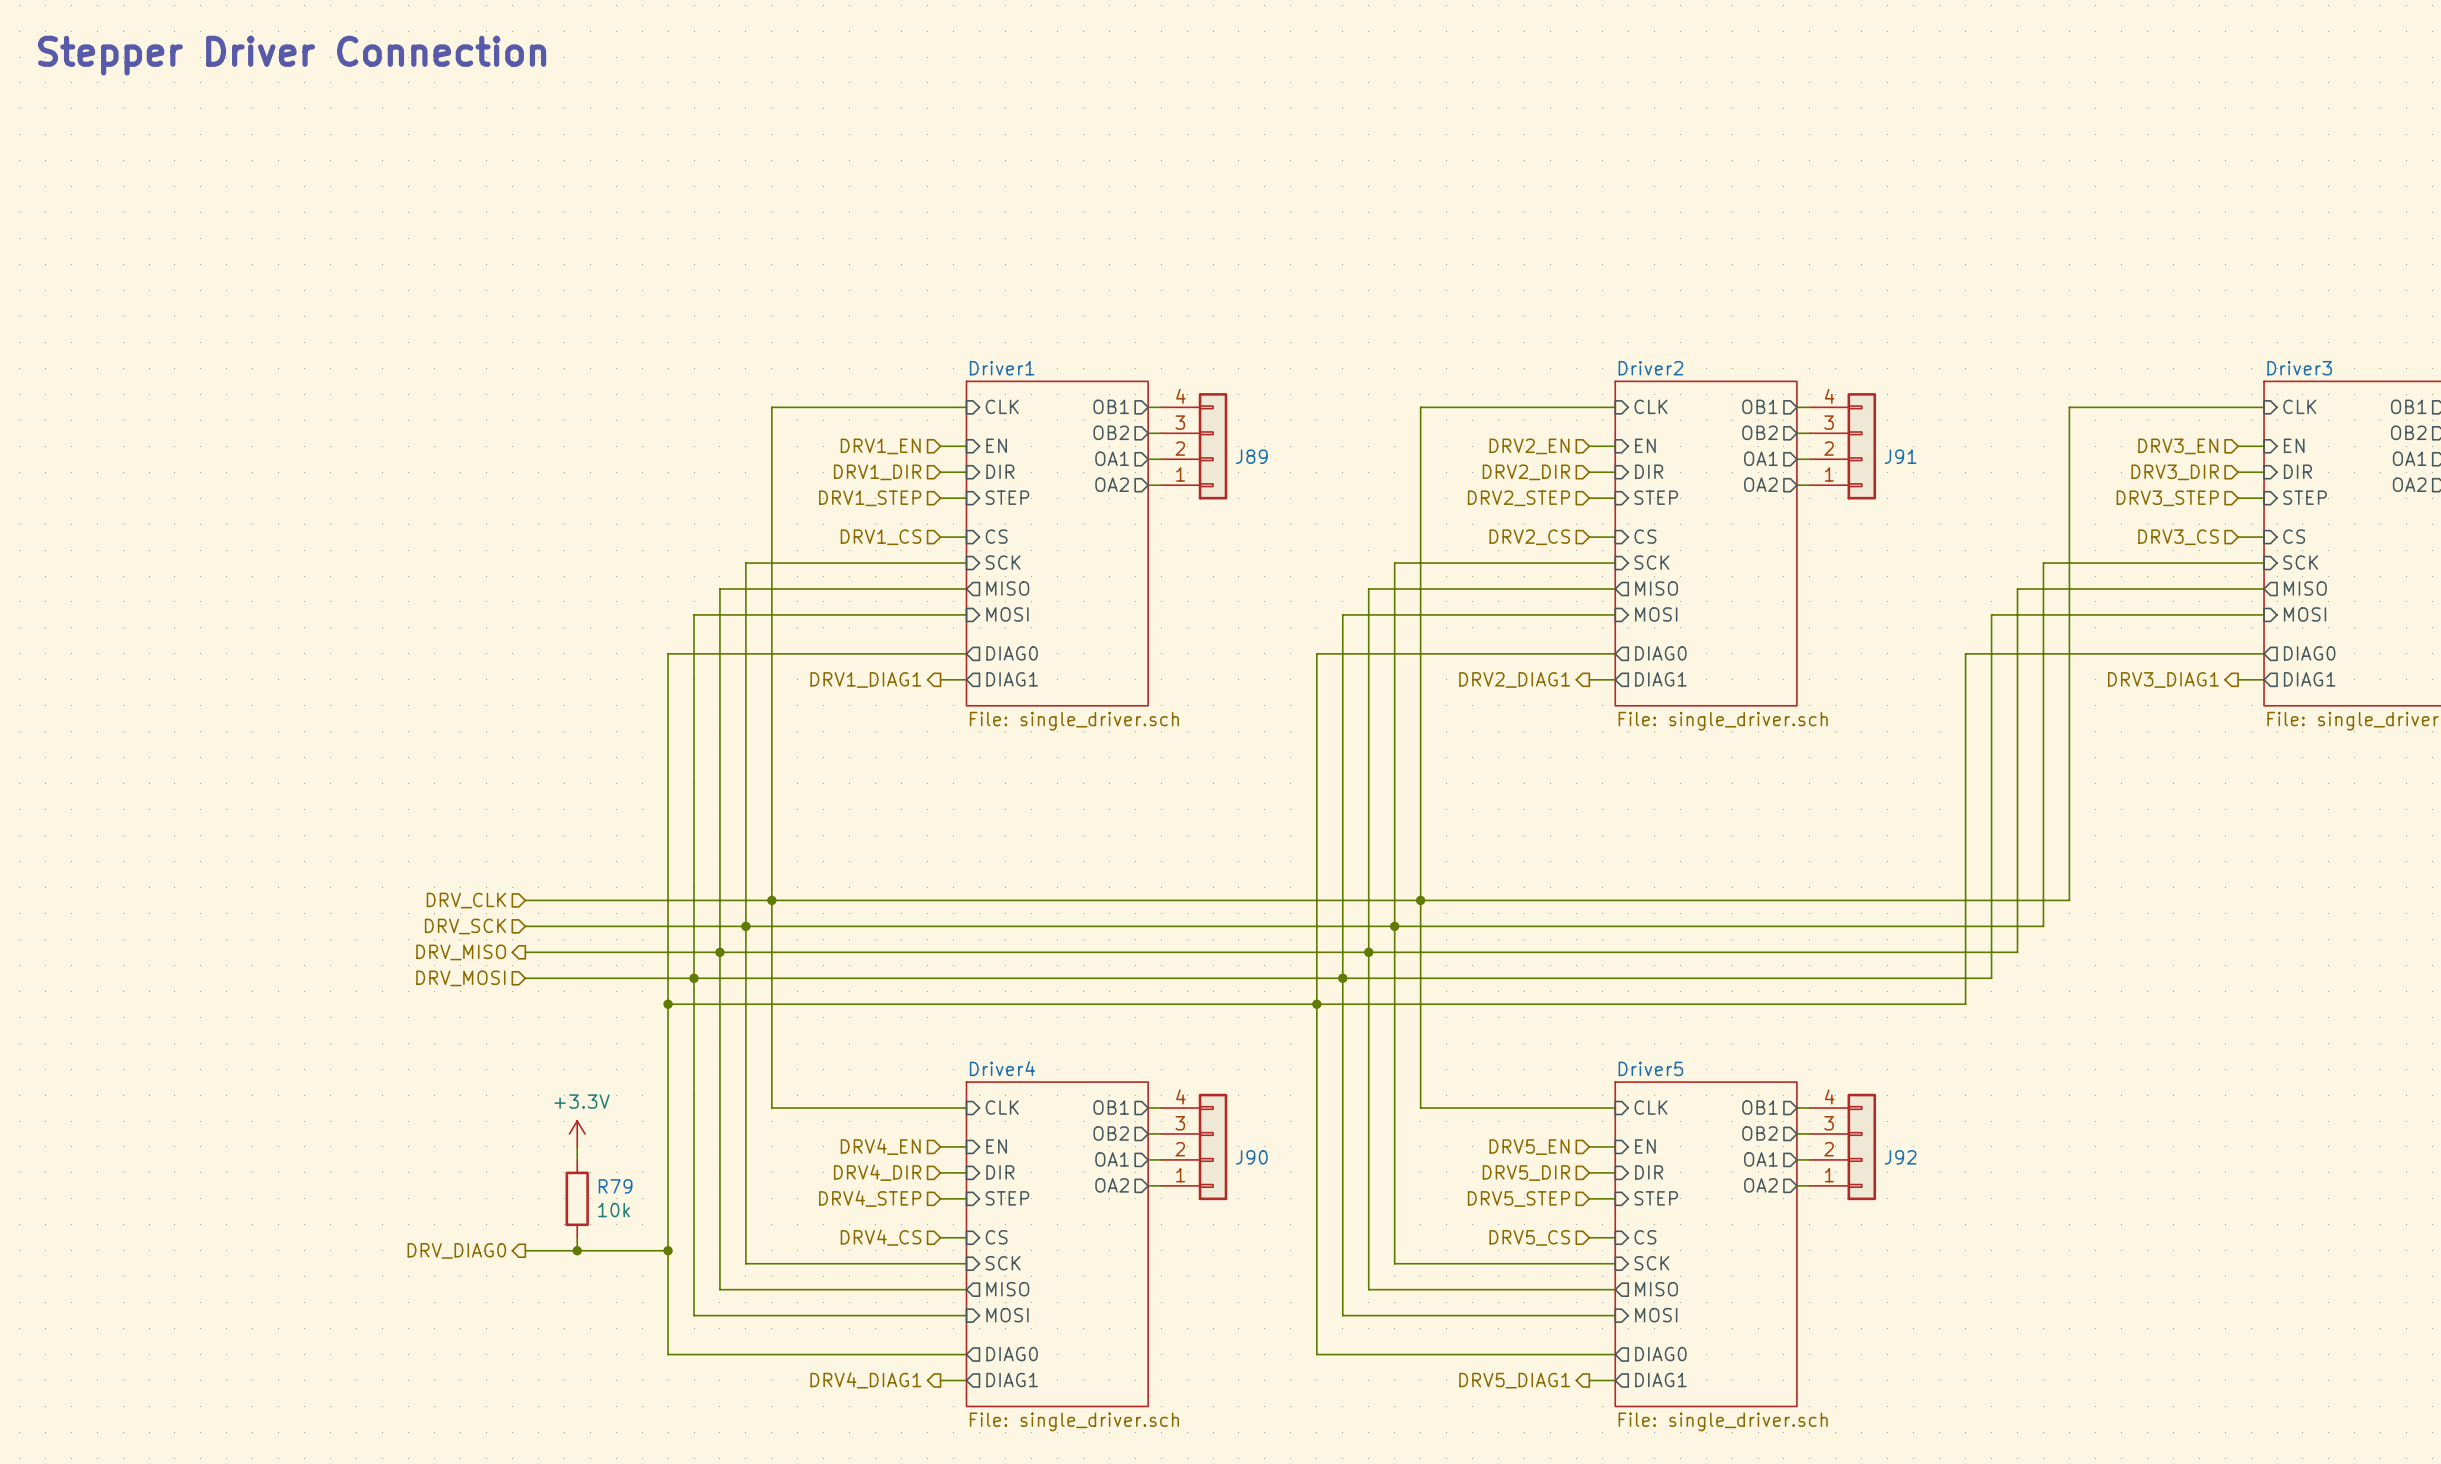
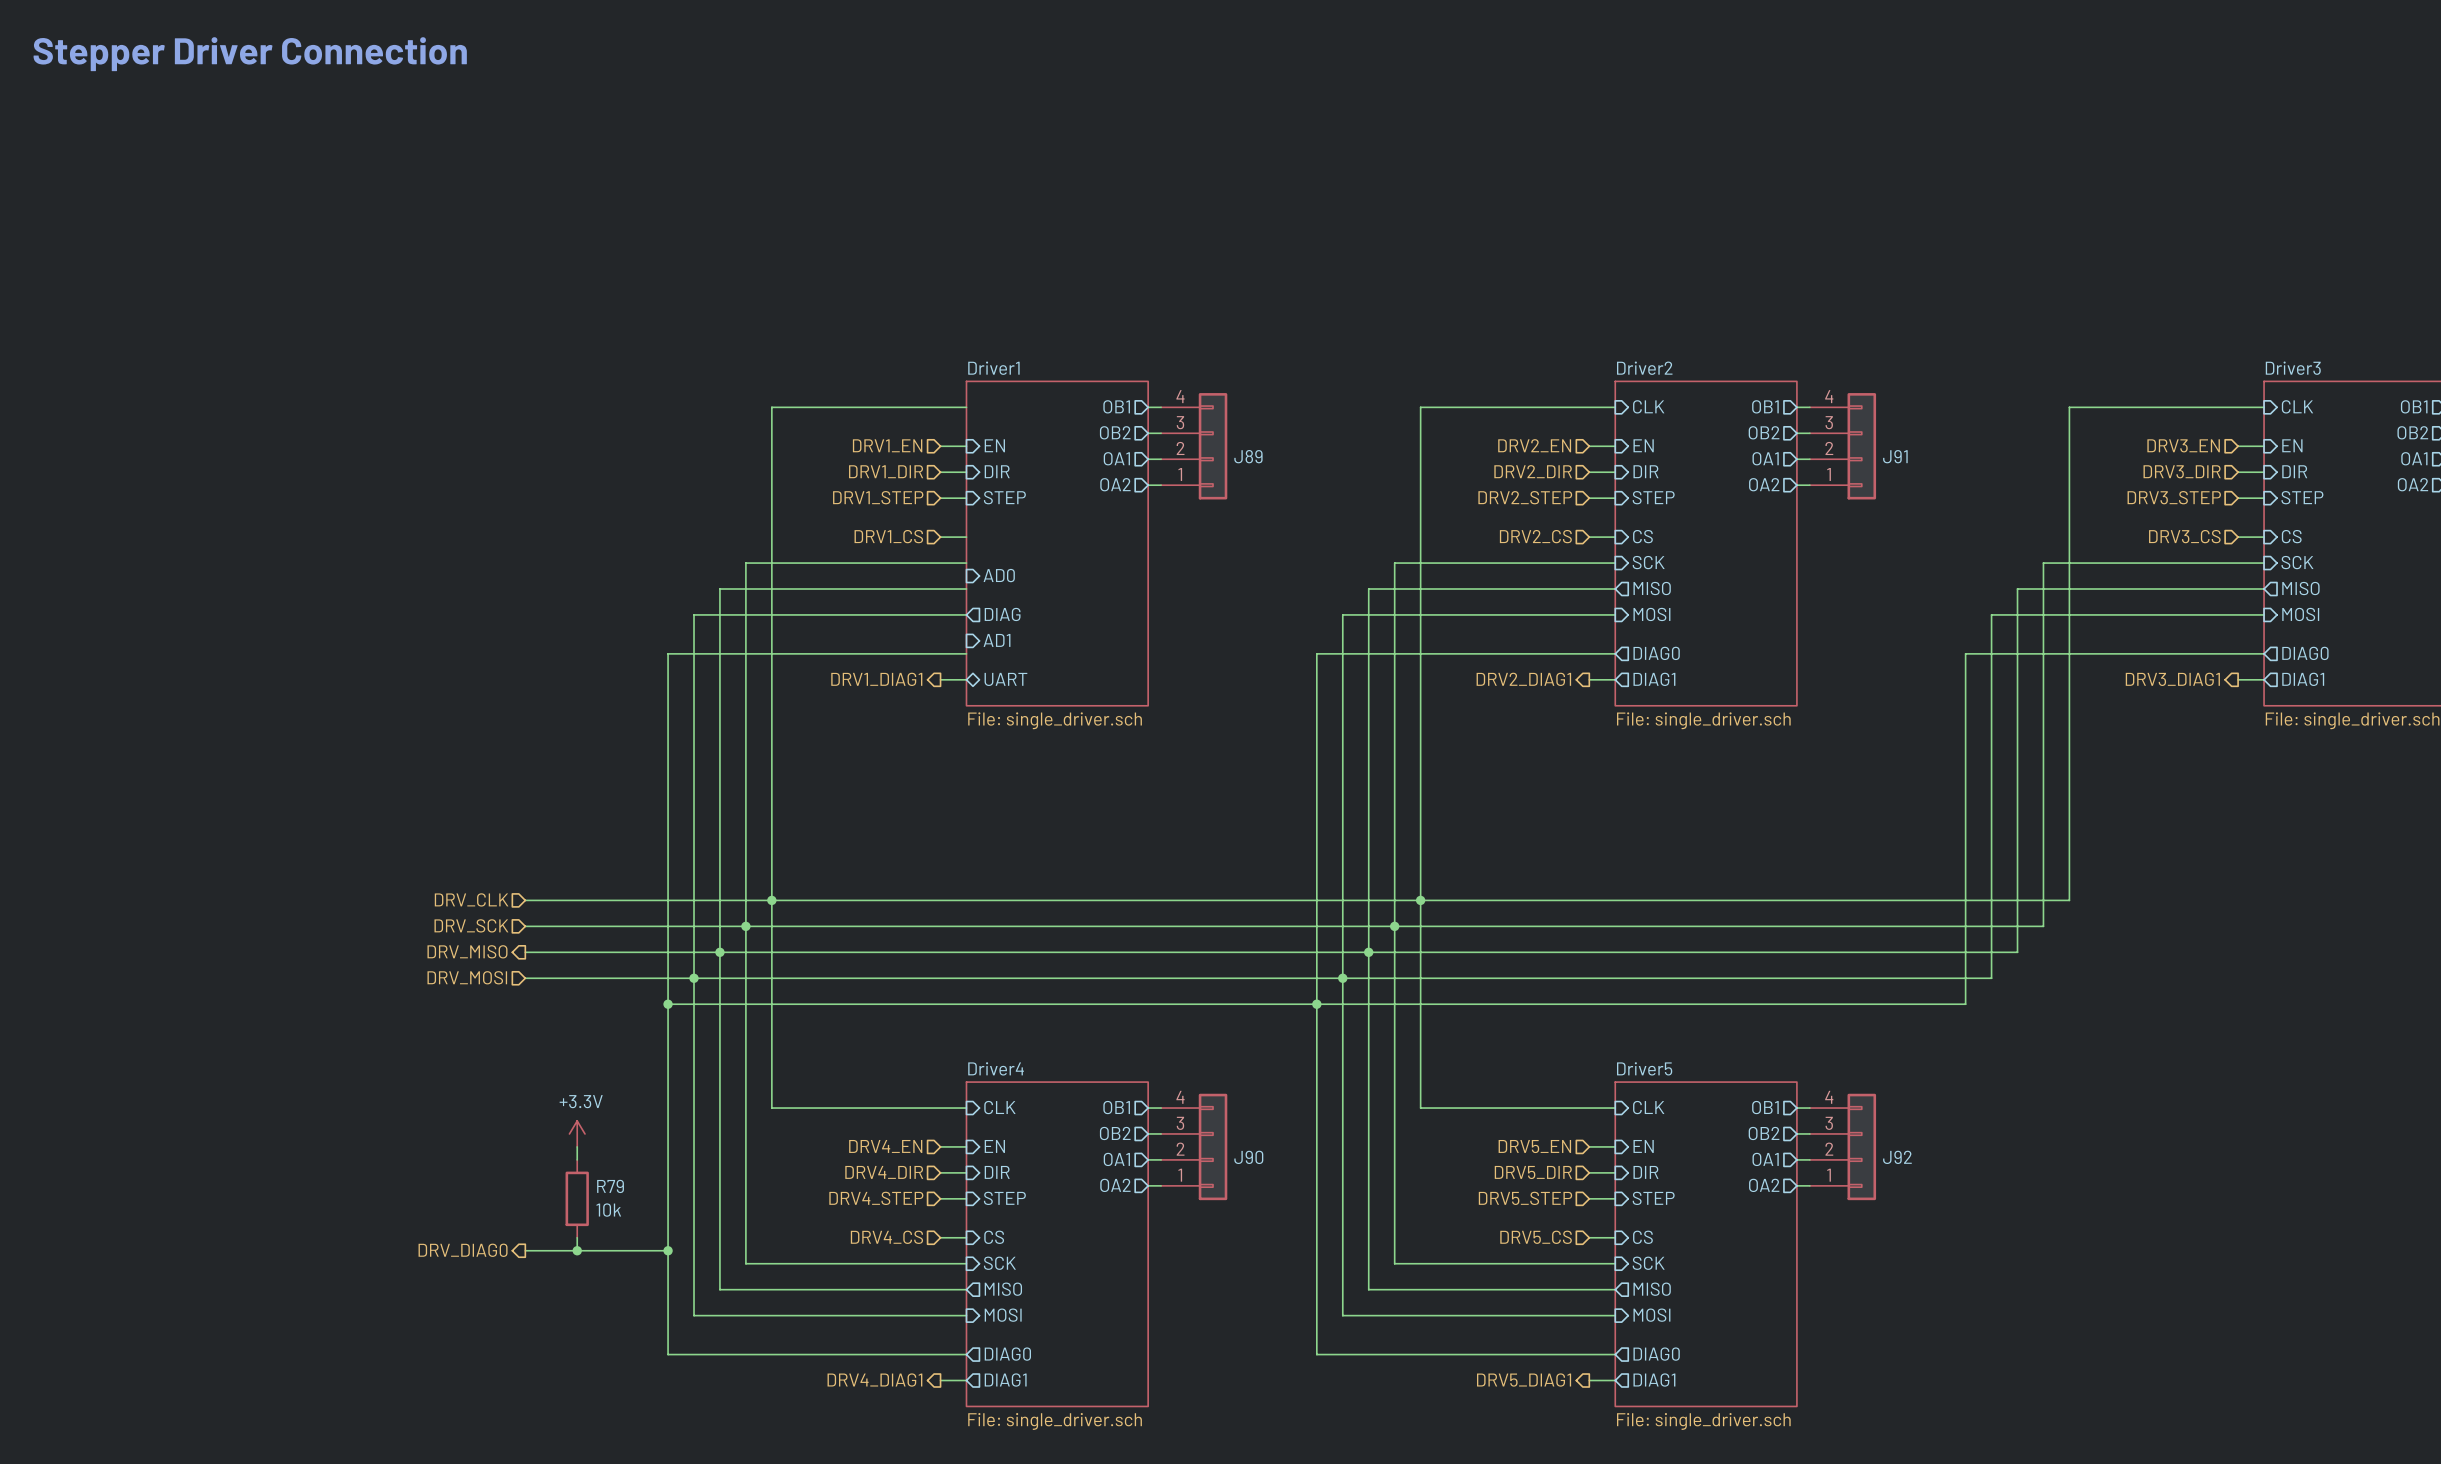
sheet pin: CLK (1002, 406) -> none
sheet pin: CS (996, 536) -> none
sheet pin: SCK (1003, 562) -> none
sheet pin: none -> AD0 (999, 575)
sheet pin: MISO (1007, 588) -> none
sheet pin shape: input (1007, 614) -> output (1002, 614)
sheet pin: MOSI (1007, 614) -> DIAG (1002, 614)
sheet pin: none -> AD1 (997, 640)
sheet pin: DIAG0 (1012, 653) -> none
sheet pin shape: output (1012, 679) -> bidirectional (1005, 679)
sheet pin: DIAG1 (1012, 679) -> UART (1005, 679)

